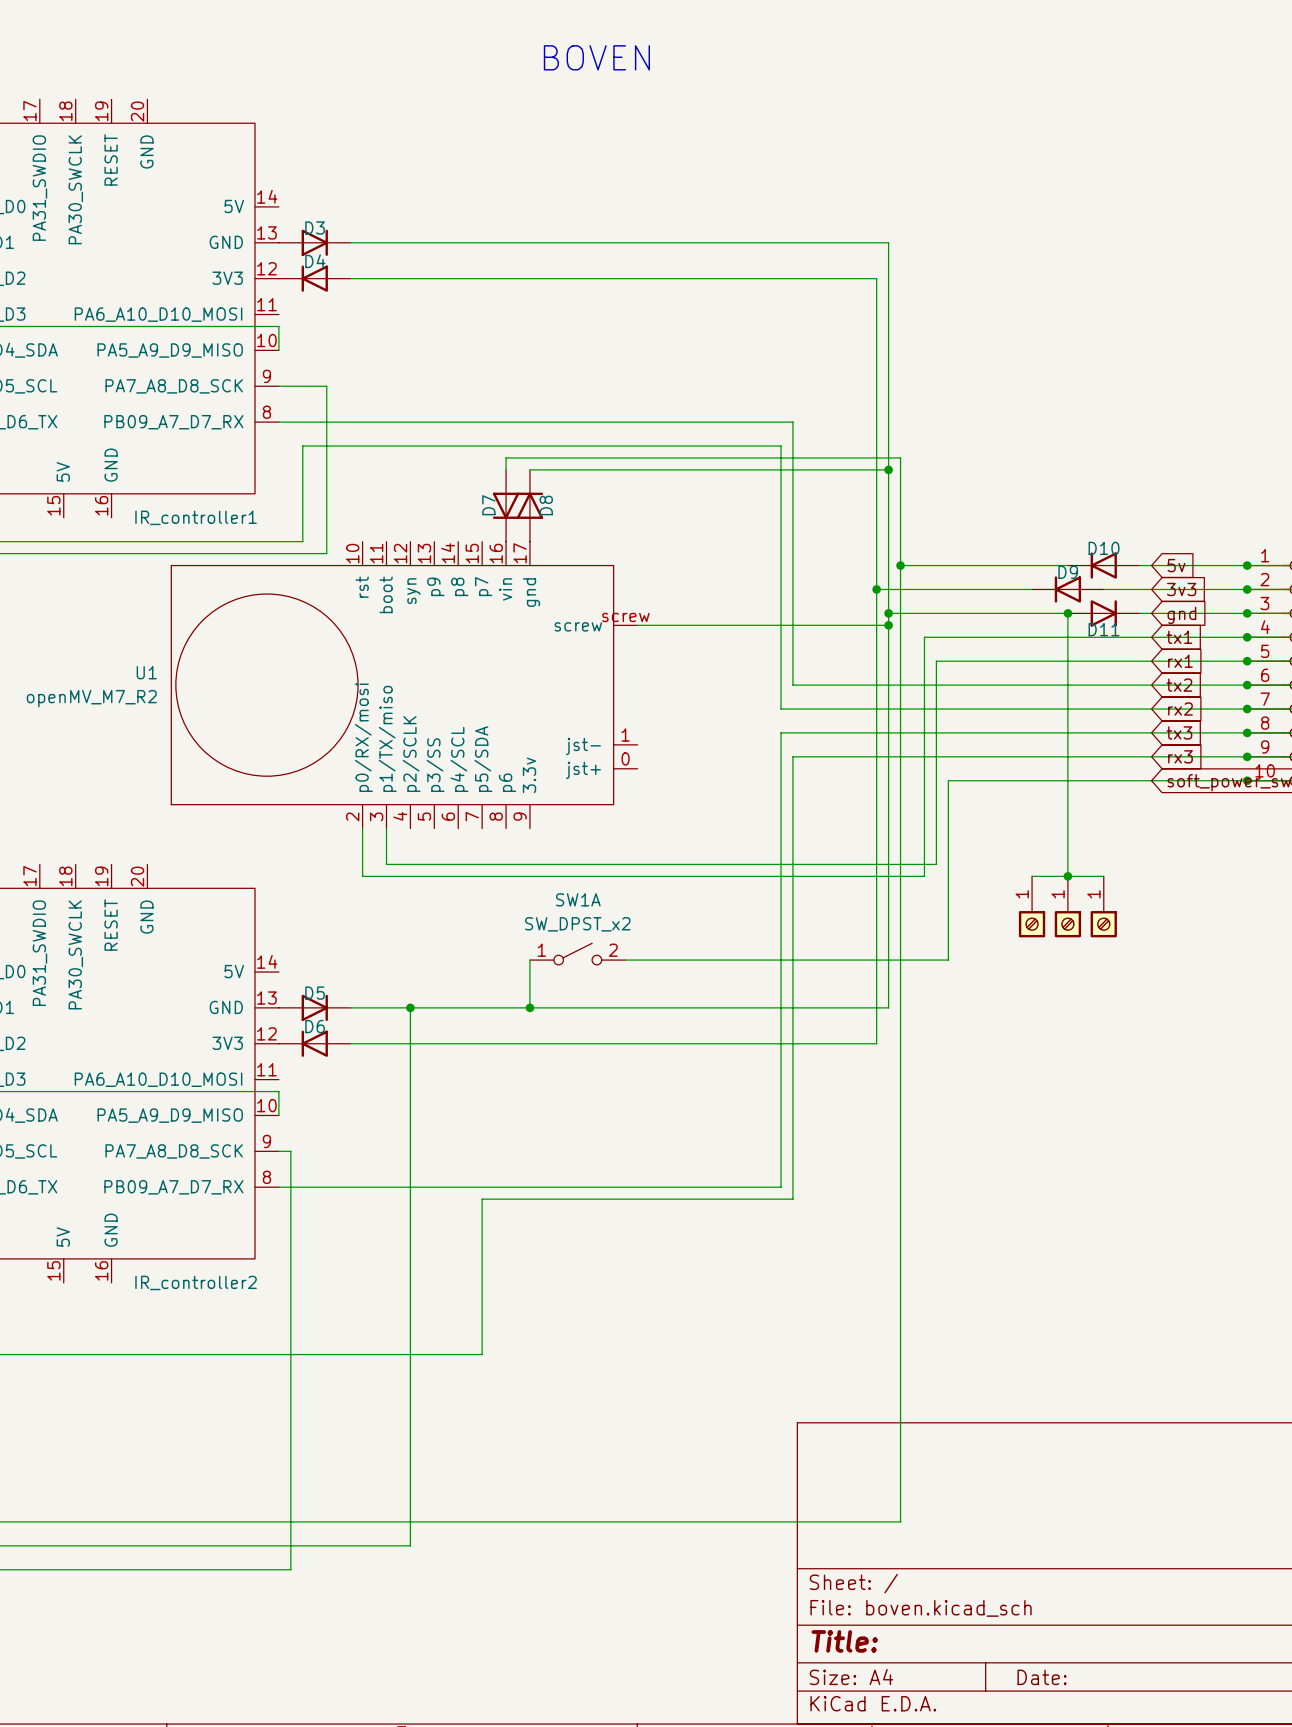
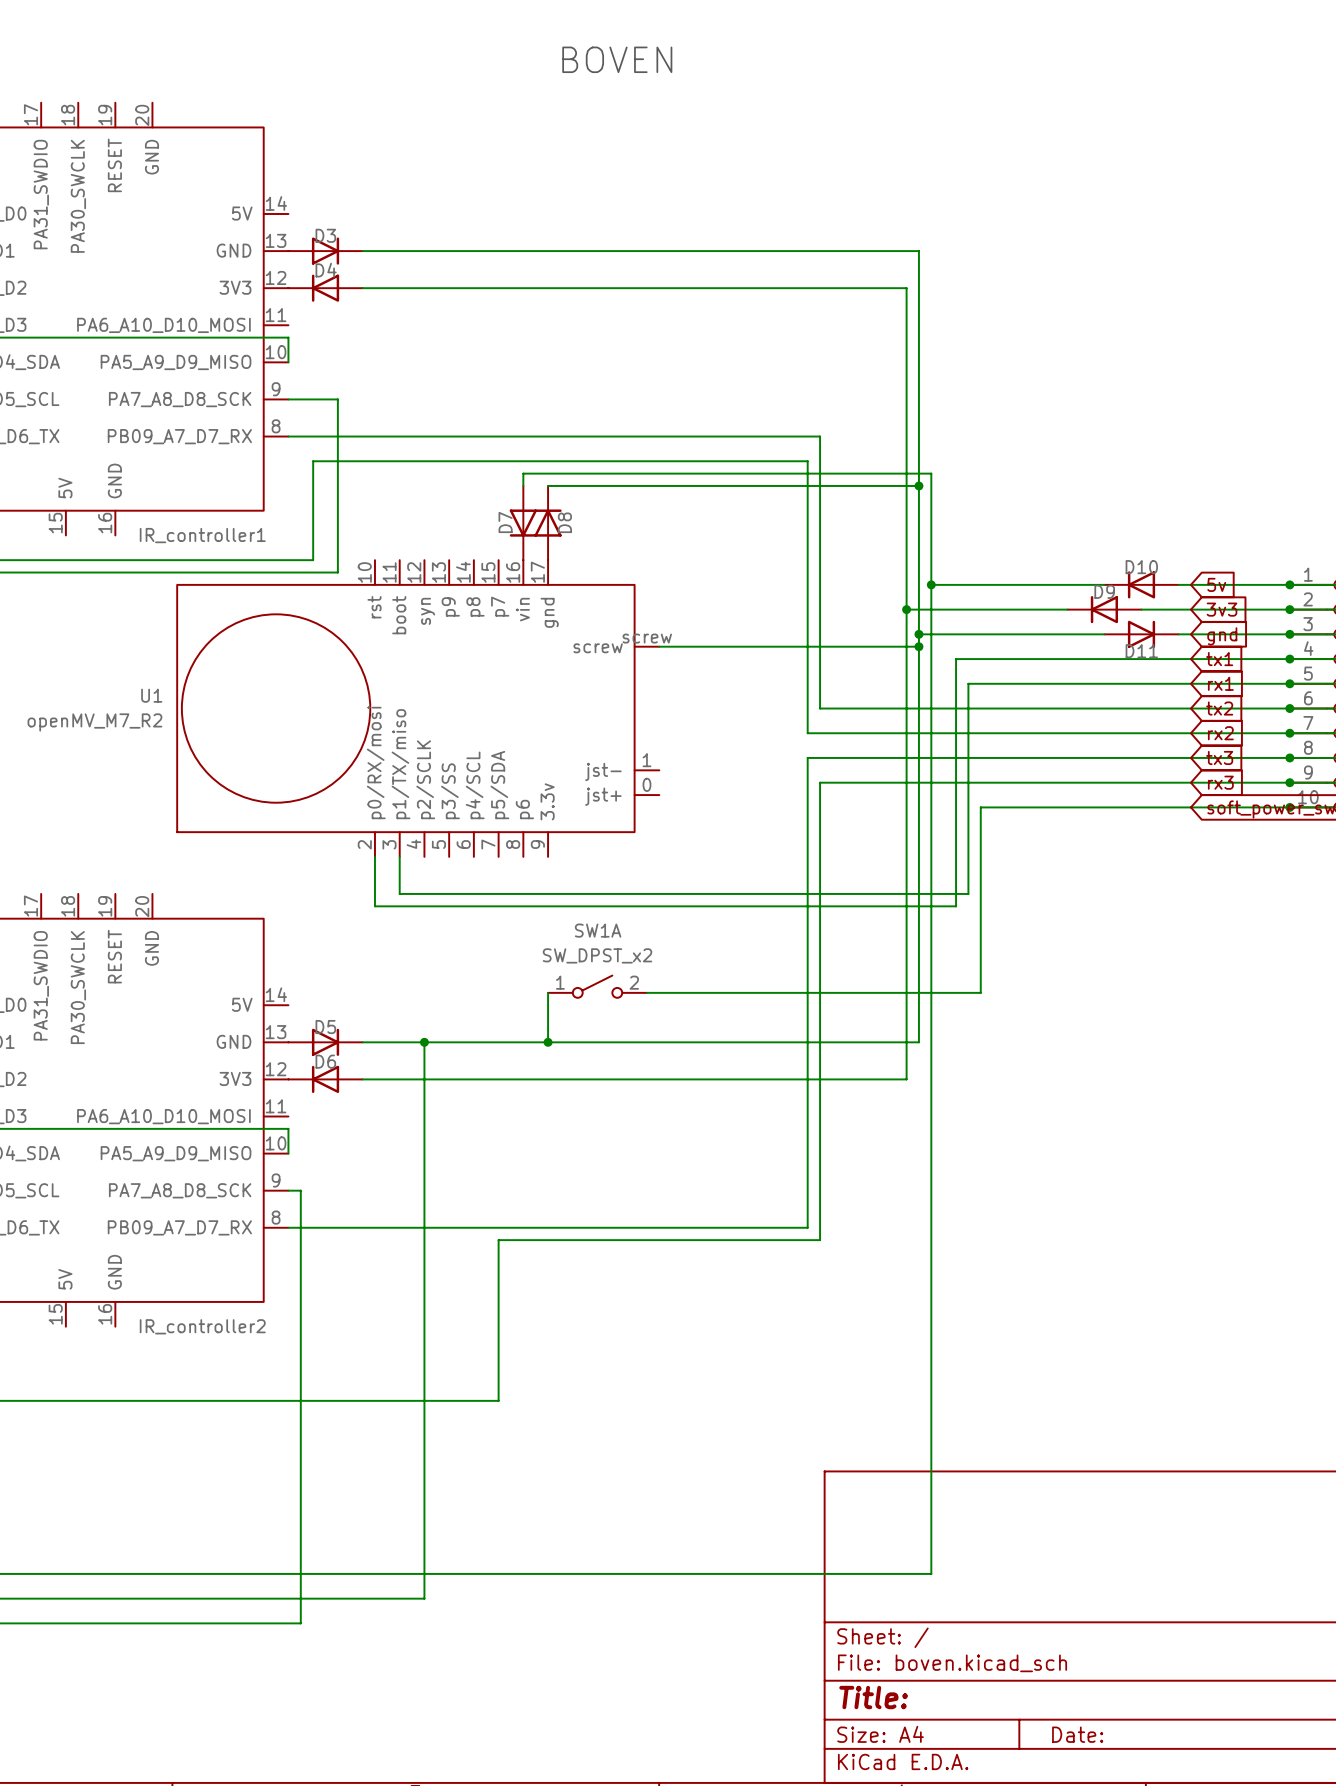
wire: (1067, 613) (1067, 876) -> none
junction: (1067, 613) -> none
wire: (1032, 876) (1103, 876) -> none
junction: (1067, 876) -> none
part: (1032, 906) -> none
part: (1067, 906) -> none
part: (1103, 906) -> none

